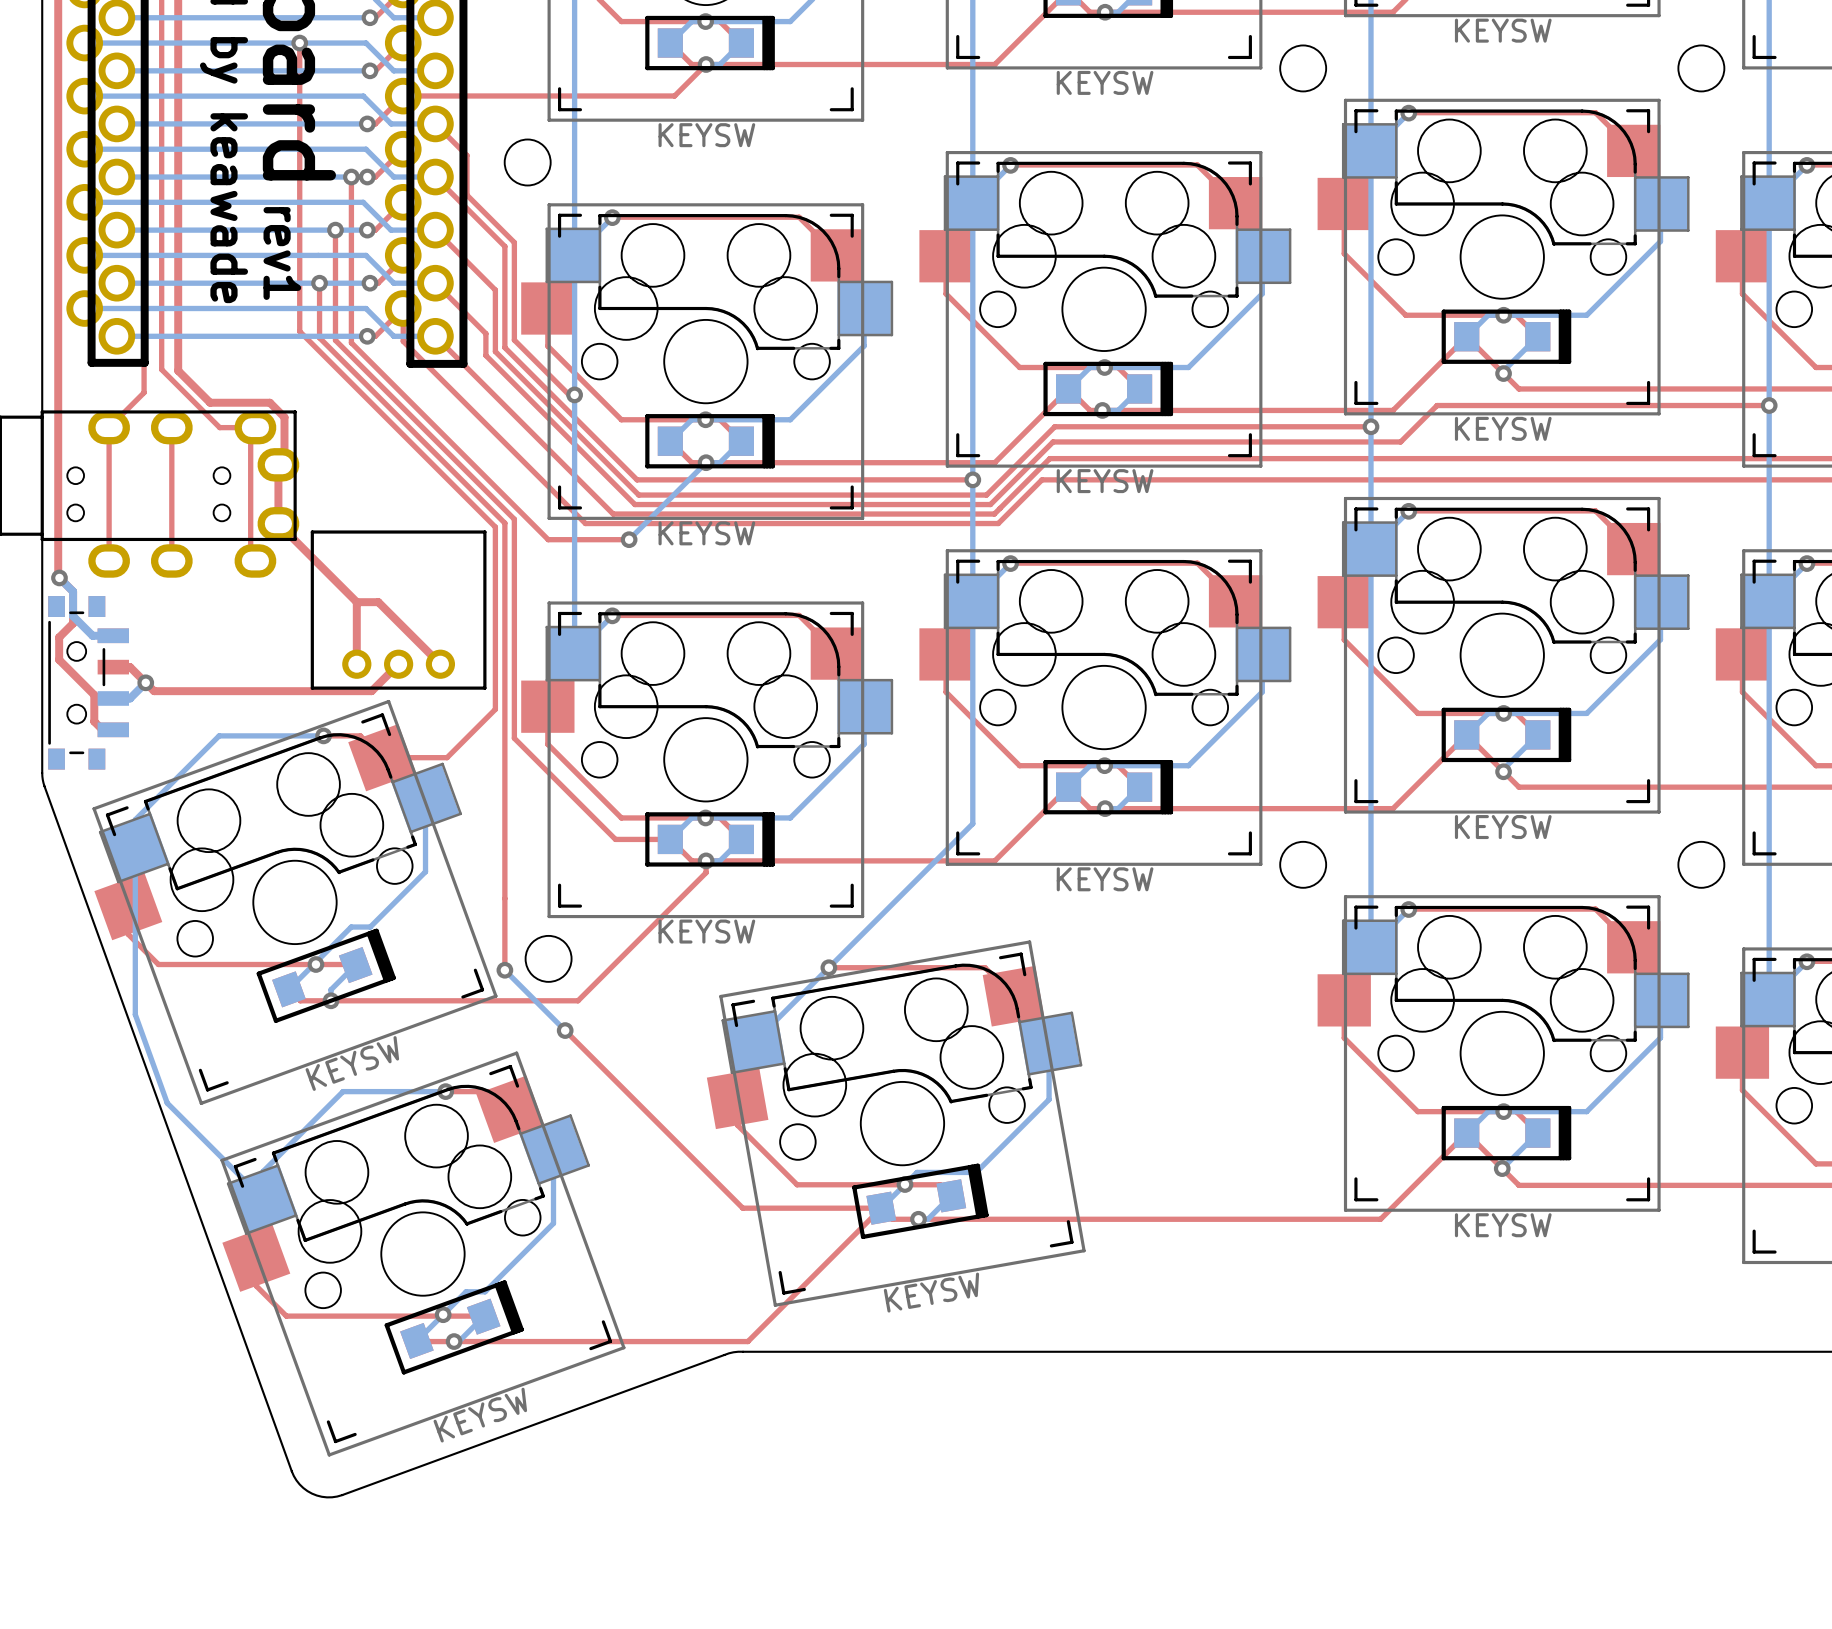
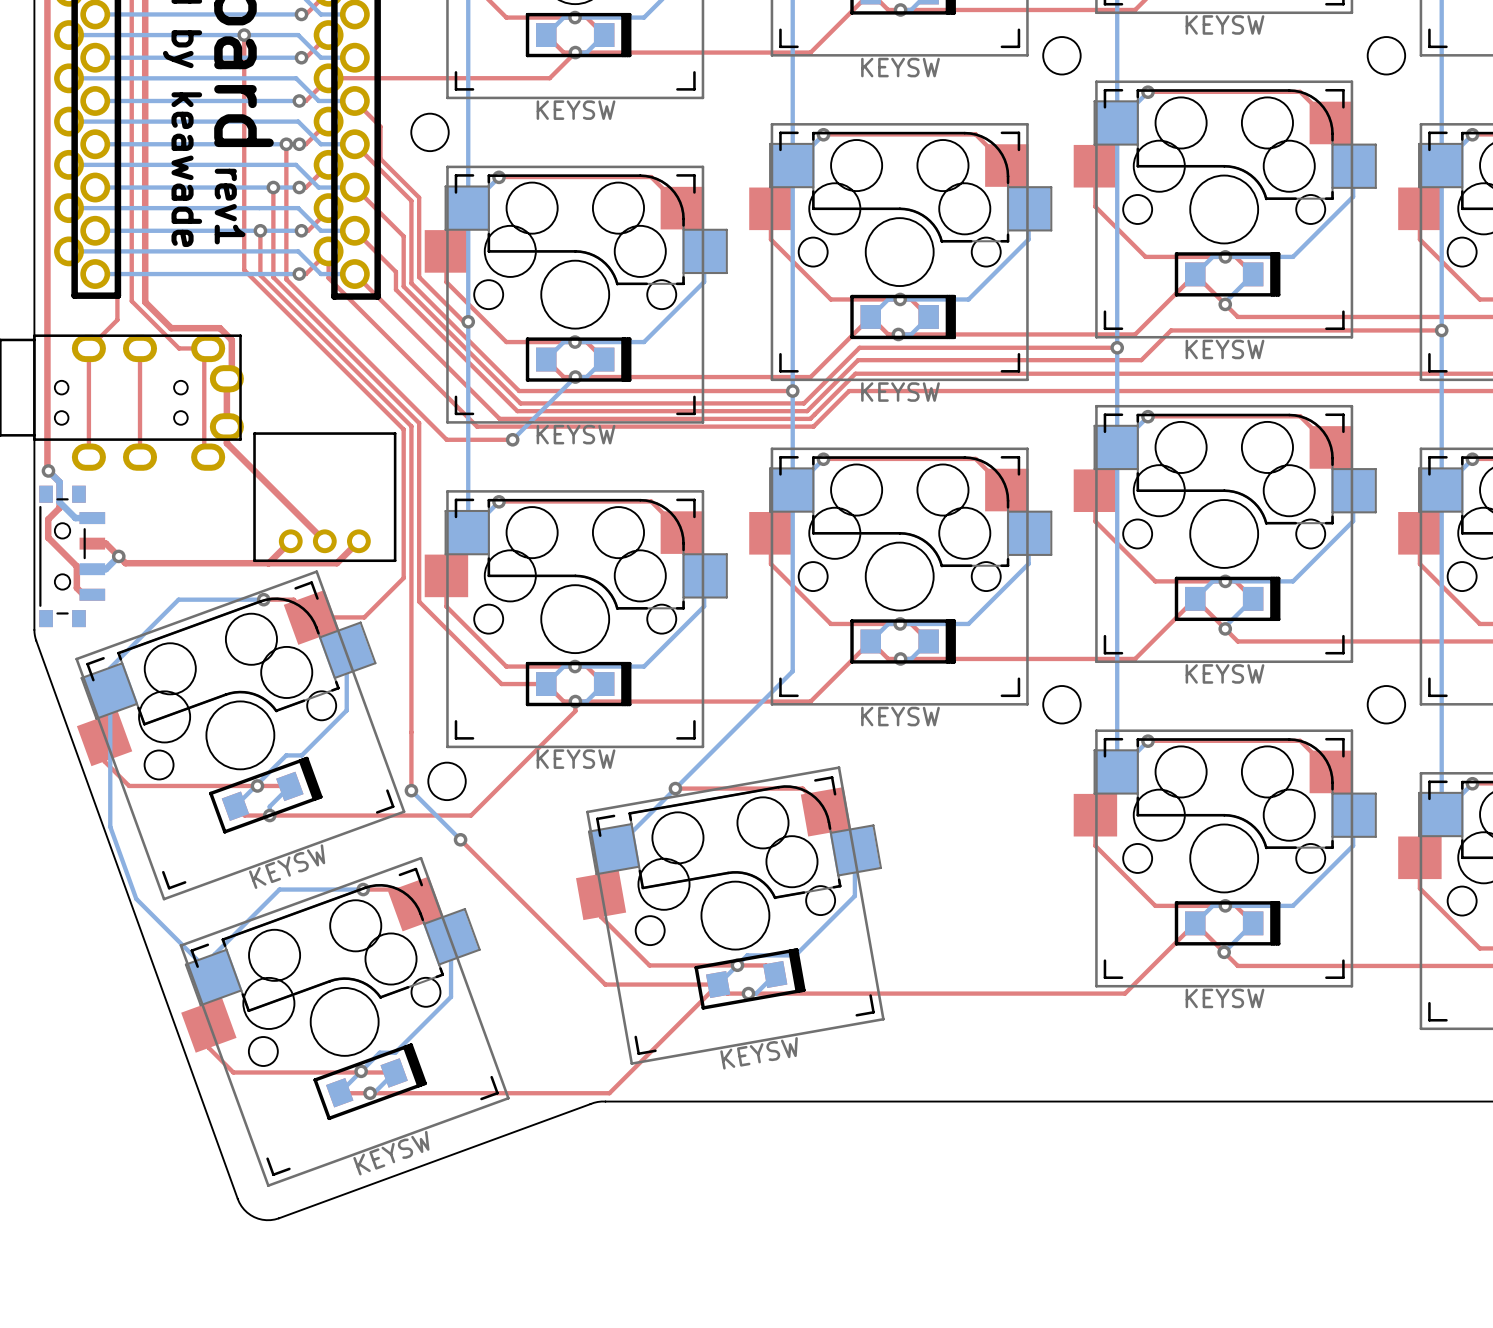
top track: (278, 523) (356, 602) -> (226, 426) (226, 443) (324, 541)
top track: (356, 602) (356, 664) -> (268, 563) (290, 541)
top track: (356, 602) (378, 602) (440, 664) -> none
top track: (398, 664) (371, 691) -> (358, 541) (336, 563) (302, 563)

